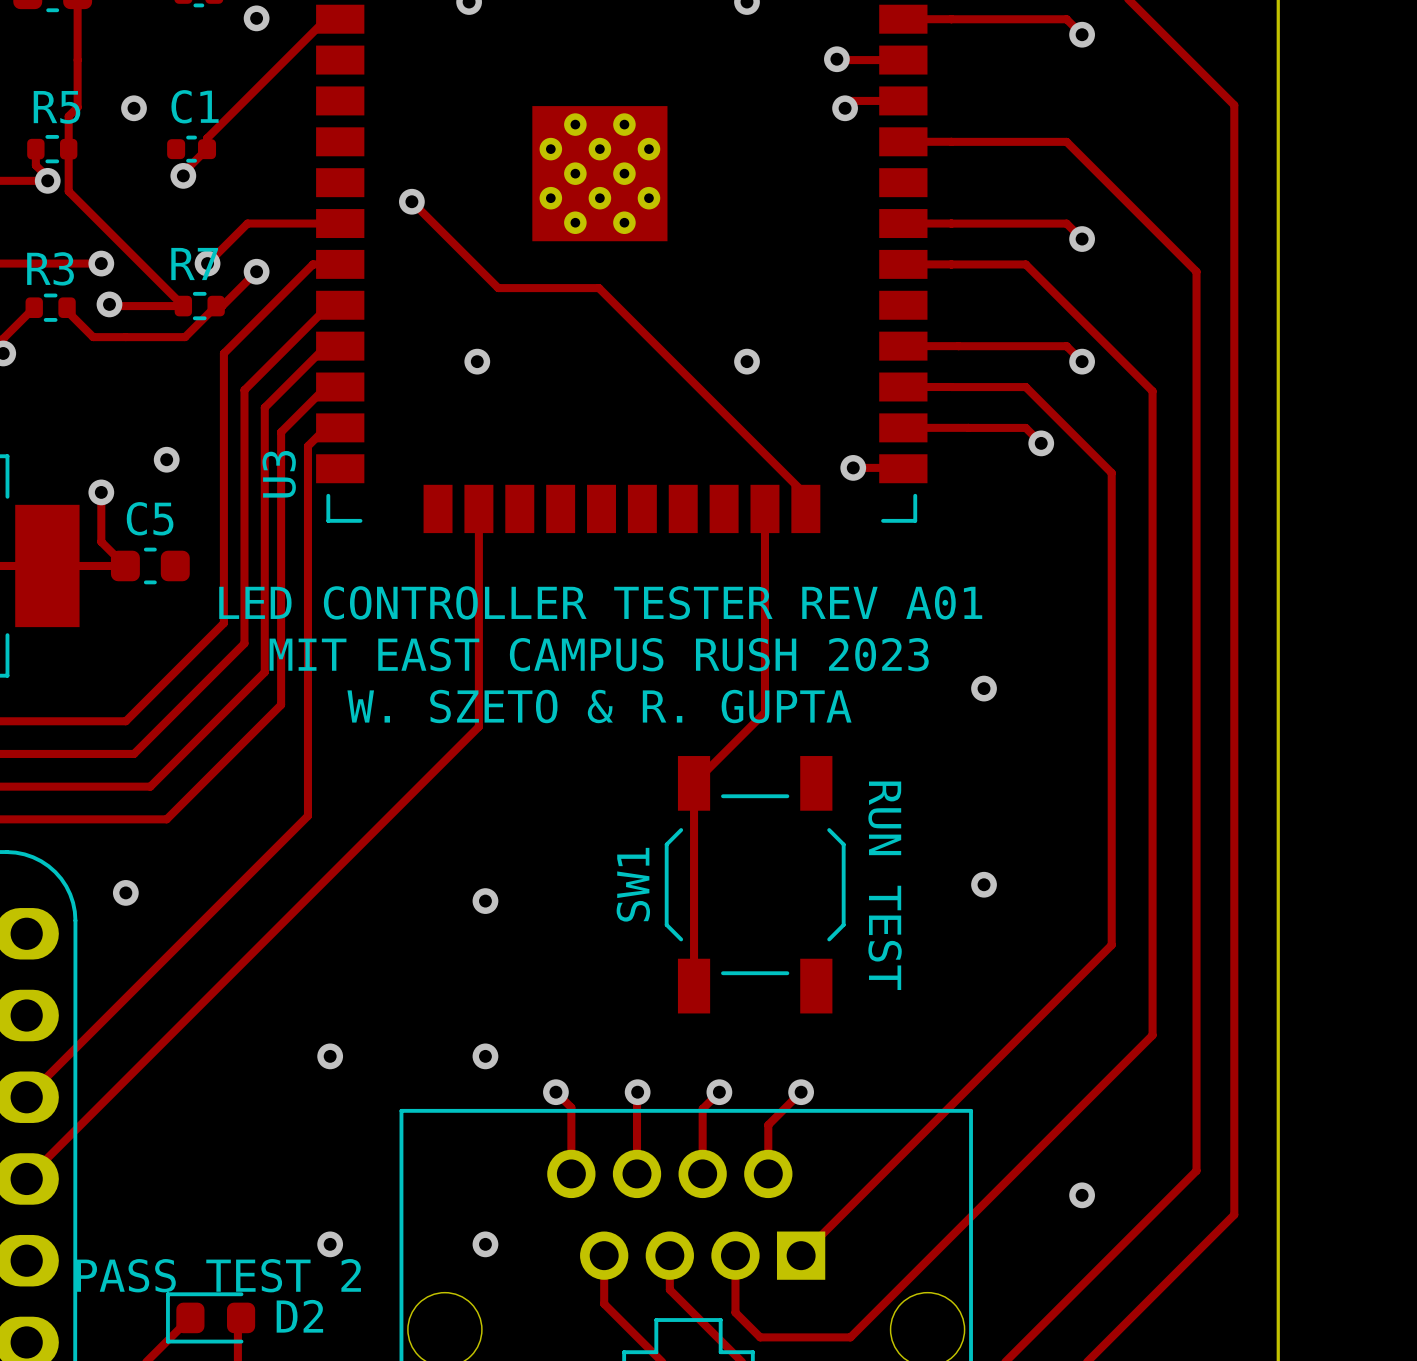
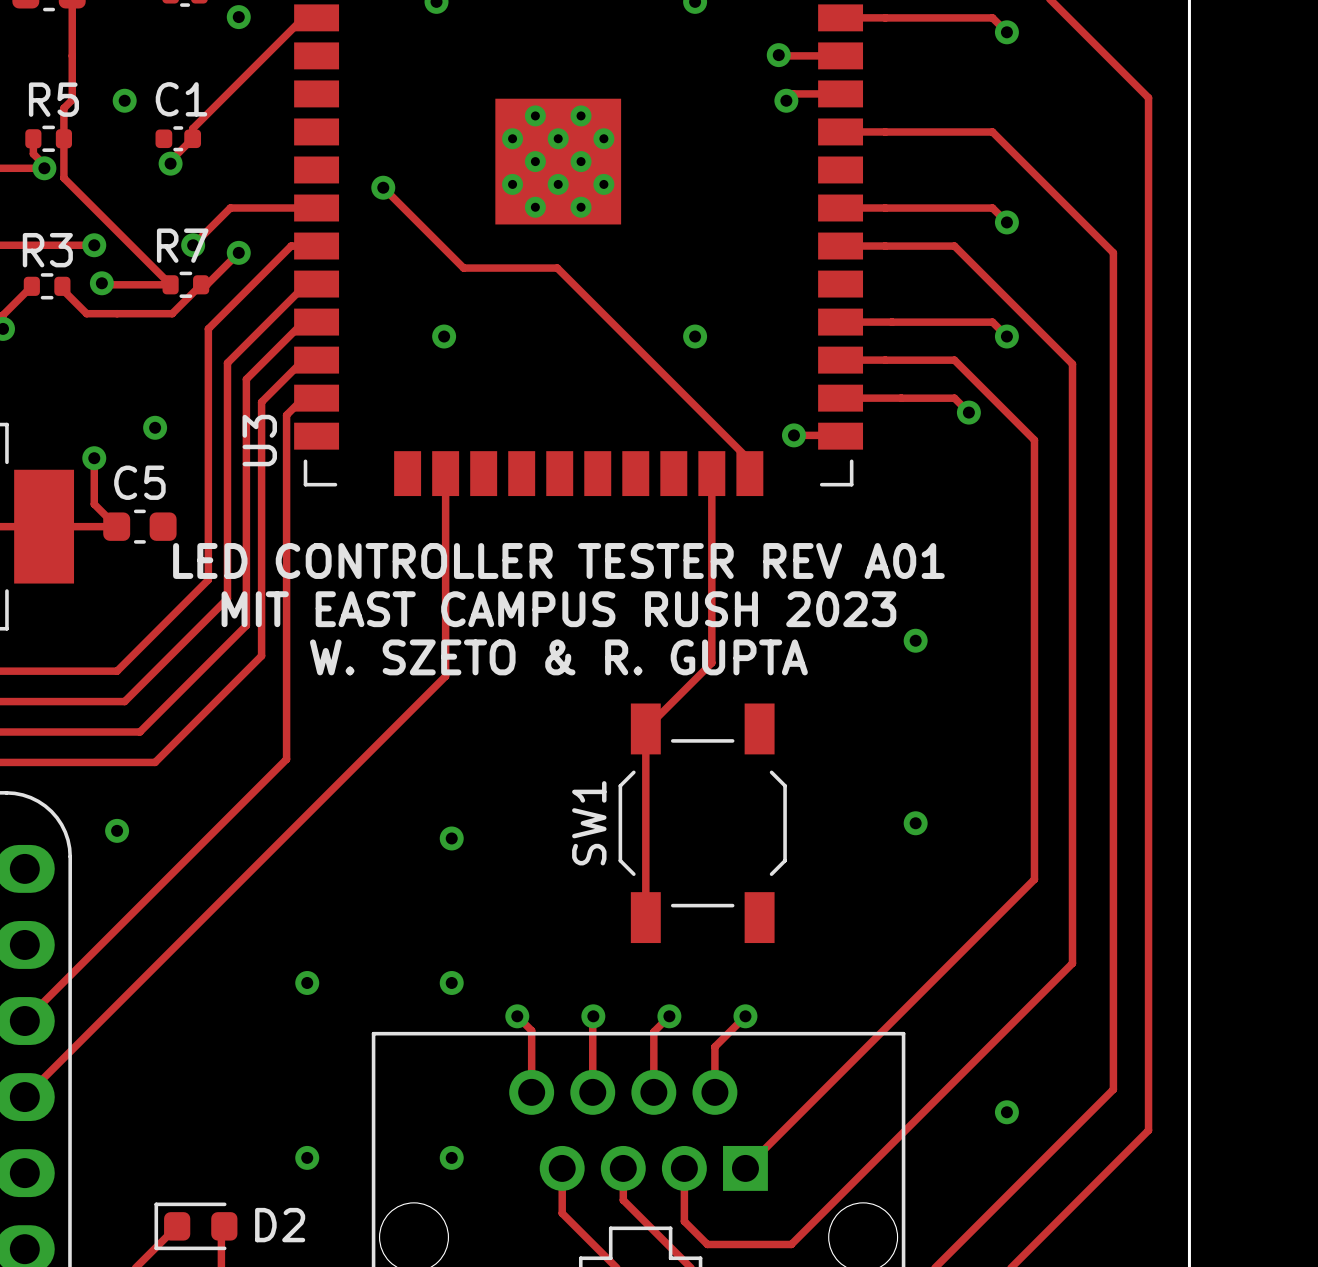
text: RUN TEST (885, 885) -> none
text: PASS TEST 2 (218, 1275) -> none

